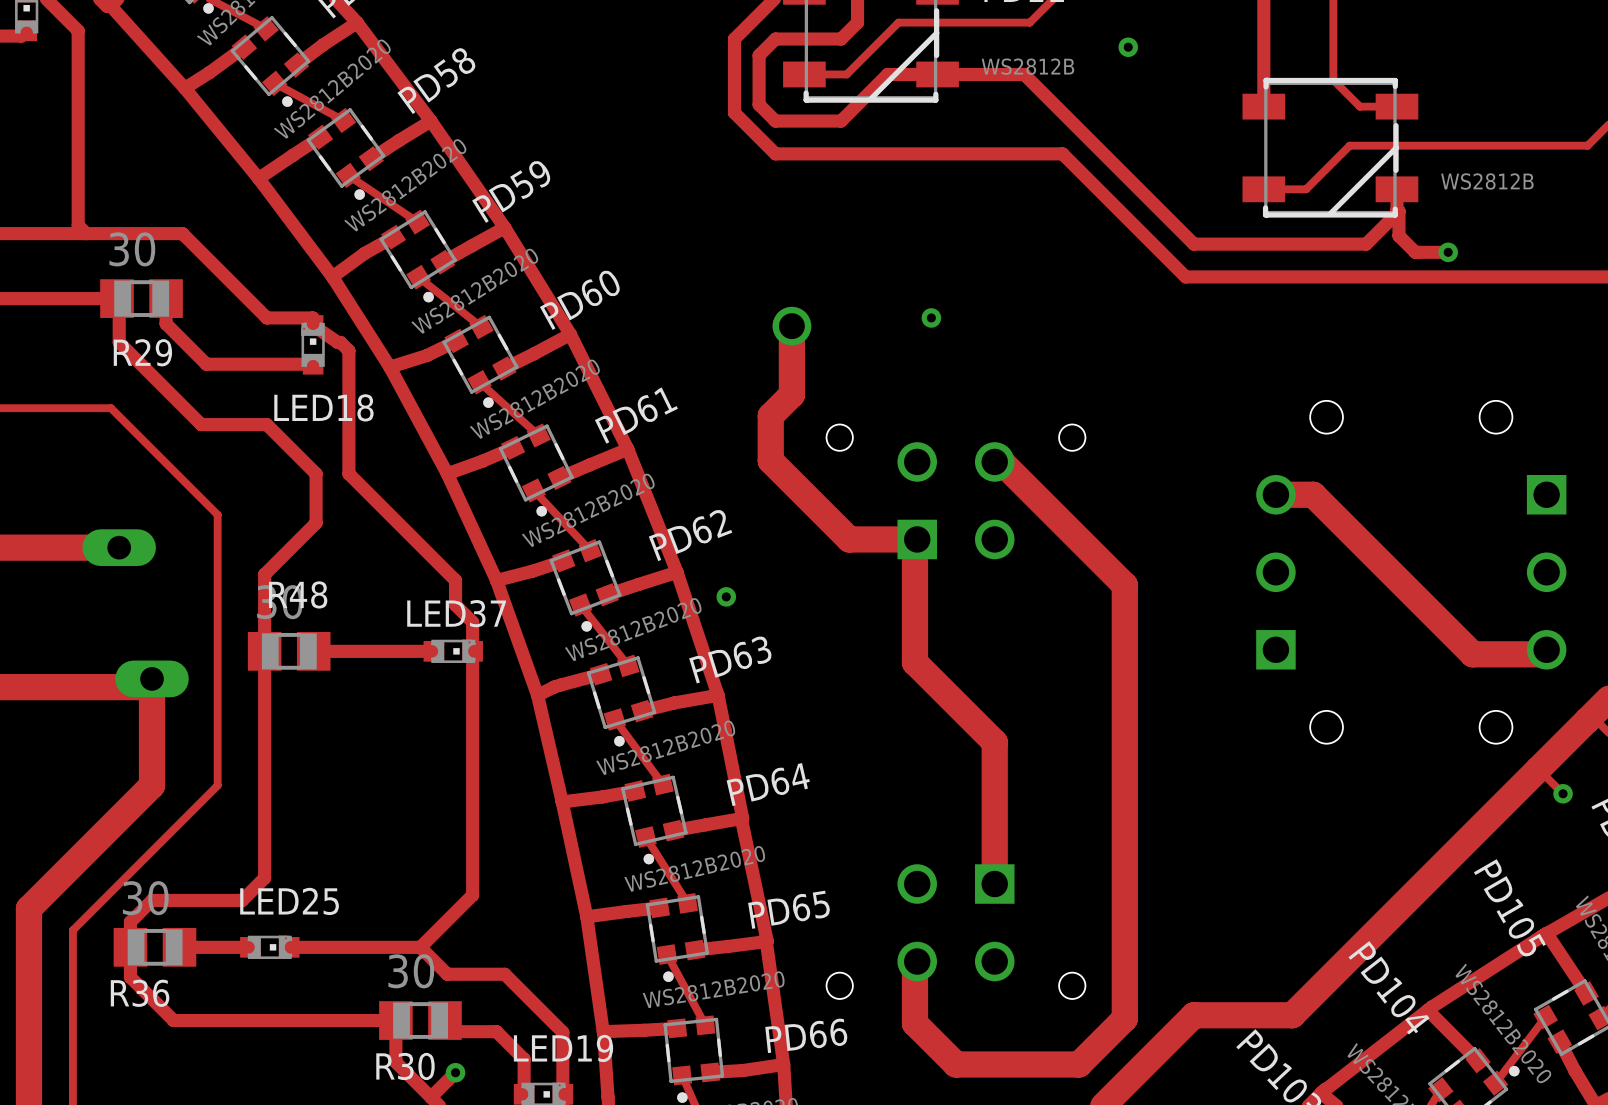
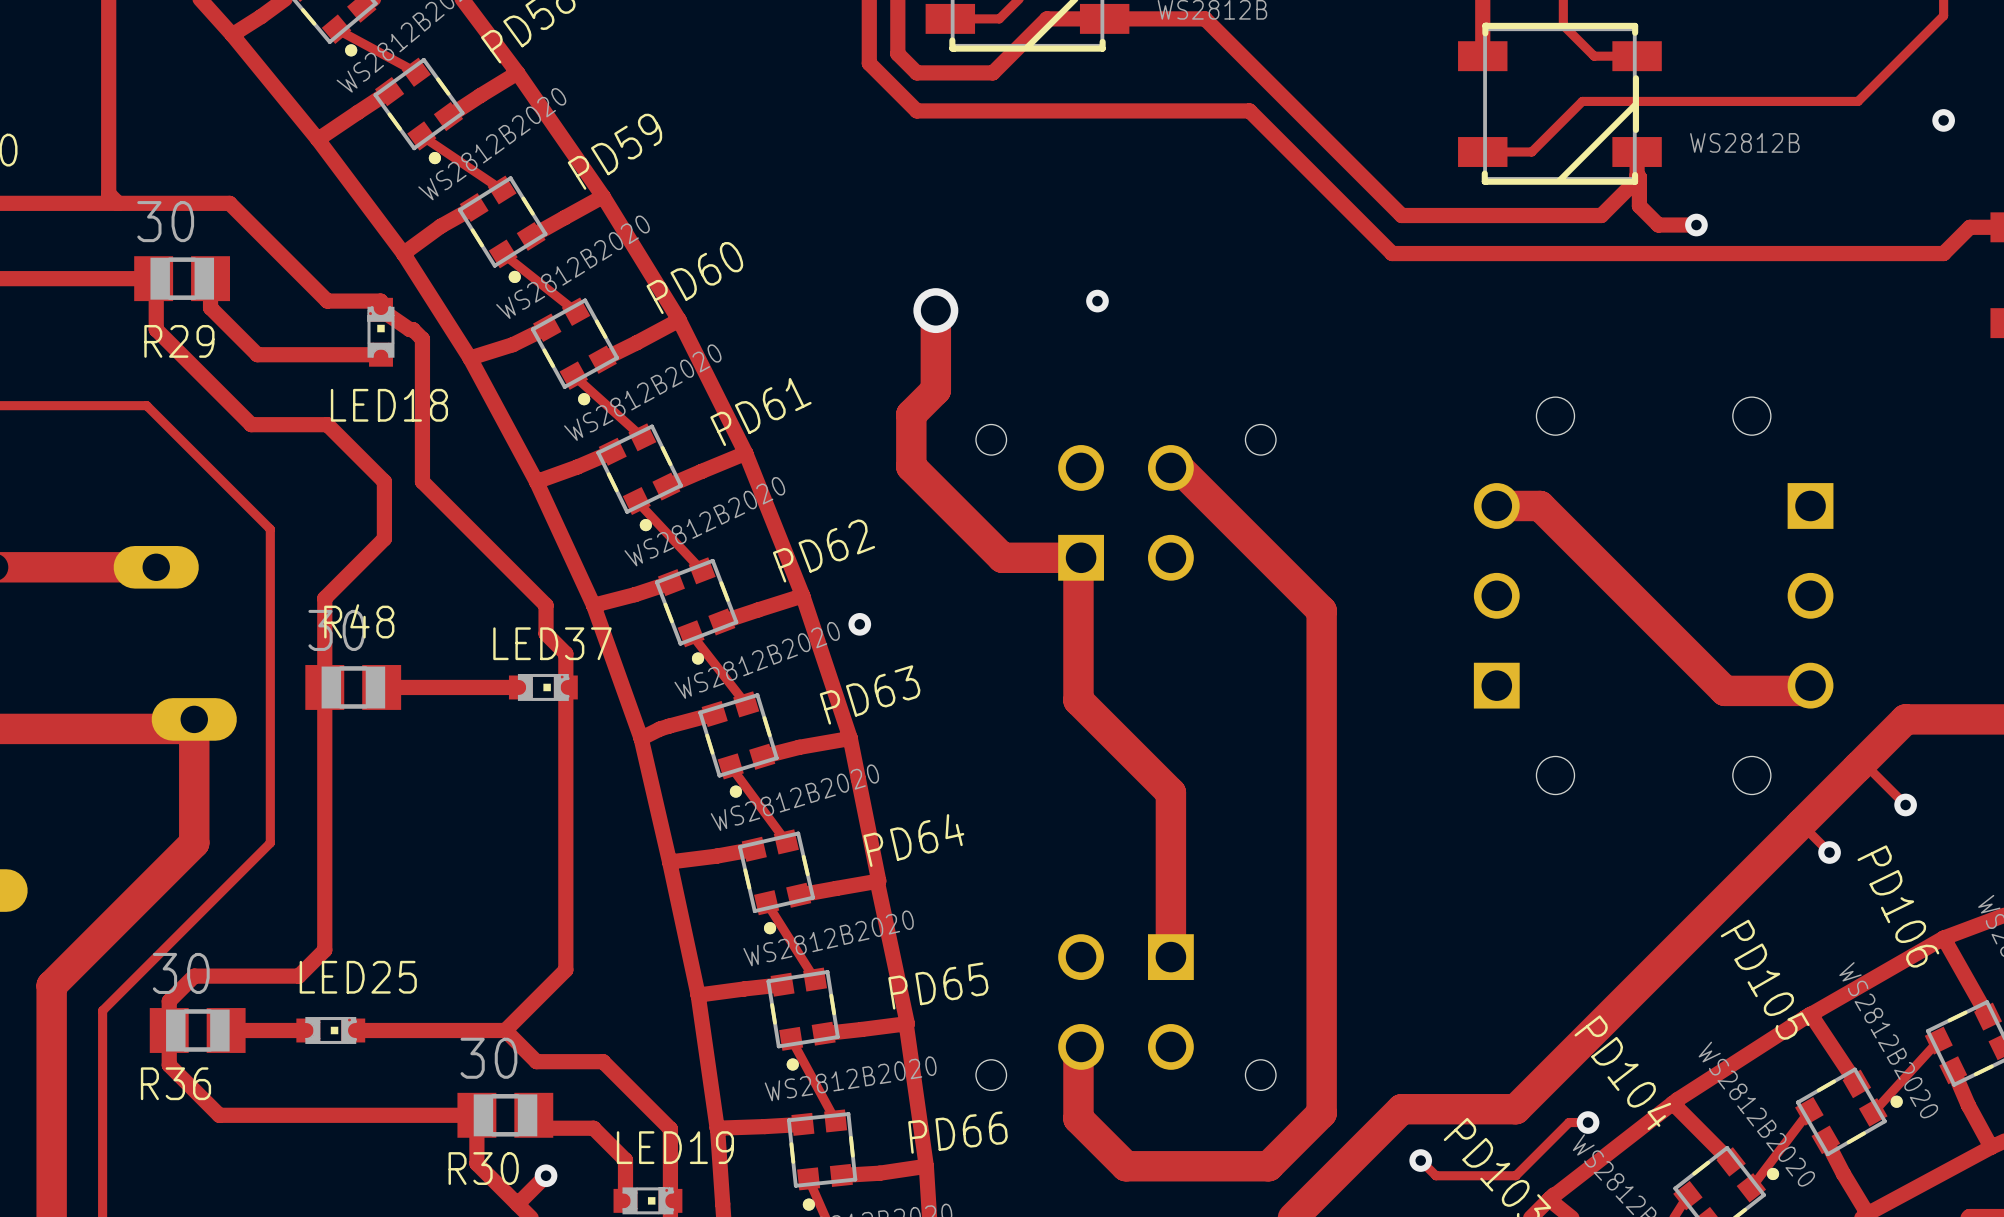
track: none -> (1588, 1122) (1569, 1122) (1515, 1175) (1435, 1175) (1420, 1160)
via: none -> (1588, 1122)
via: none -> (1420, 1160)

